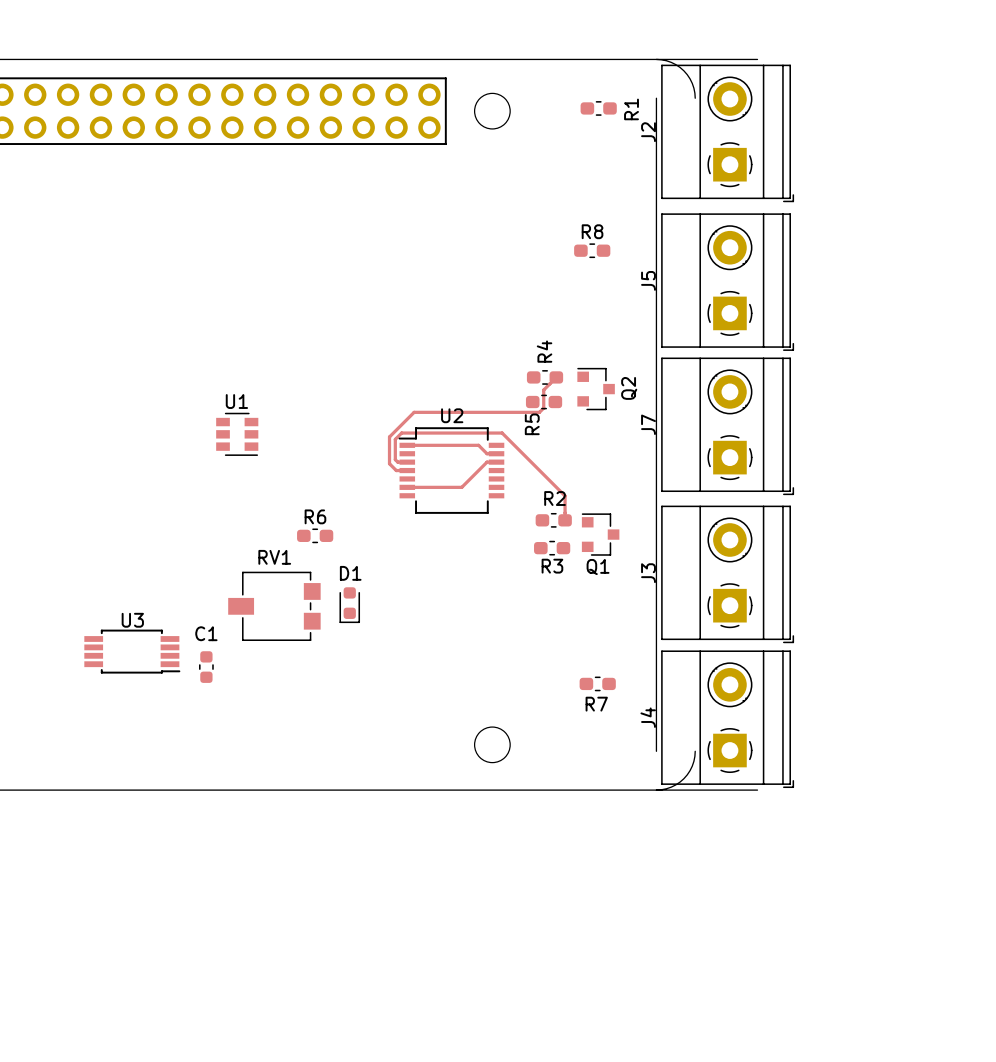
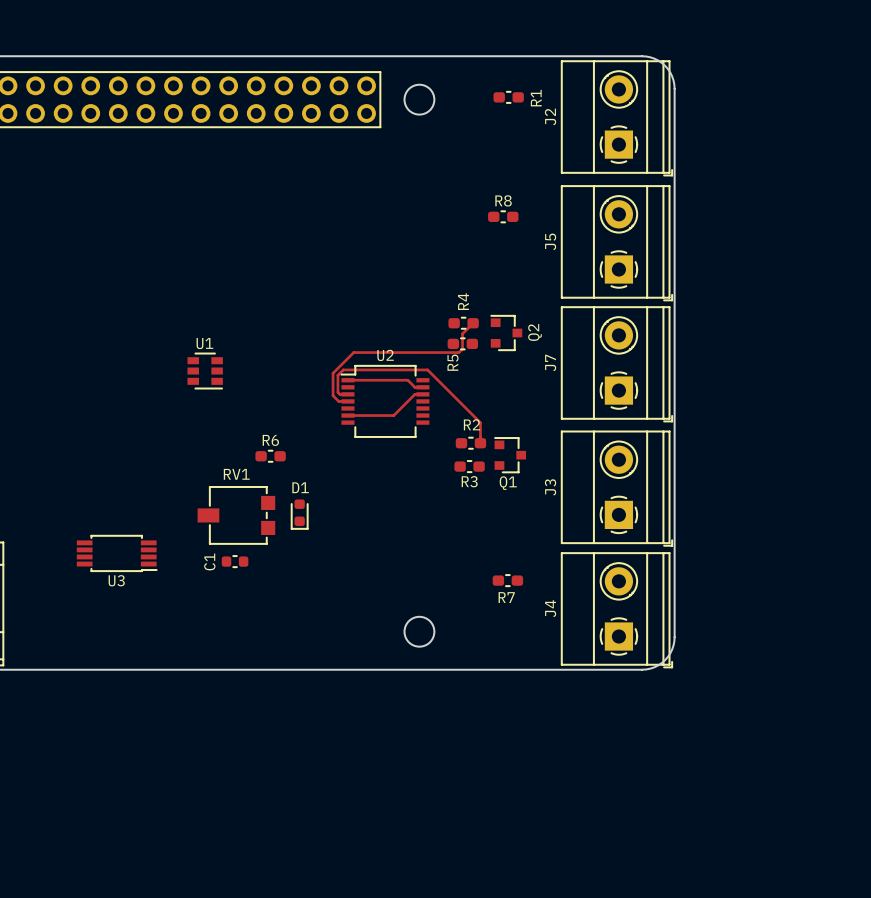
board edge: (656, 59) (671, 62) (683, 70) (692, 83) (695, 98) -> none
board edge: none -> (642, 56) (654, 58) (665, 65) (672, 76) (674, 88) (674, 637) (672, 649) (665, 660) (654, 667) (642, 669)
board edge: (656, 98) (656, 751) -> none
U3 name position: U3 (132, 620) -> U3 (116, 580)
C1 name position: C1 (206, 633) -> C1 (209, 561)
C1 rotation: 0° (206, 667) -> 90° clockwise (235, 561)
C1 position: (206, 667) -> (235, 561)
board edge: (695, 751) (692, 766) (683, 778) (671, 787) (656, 790) -> none

